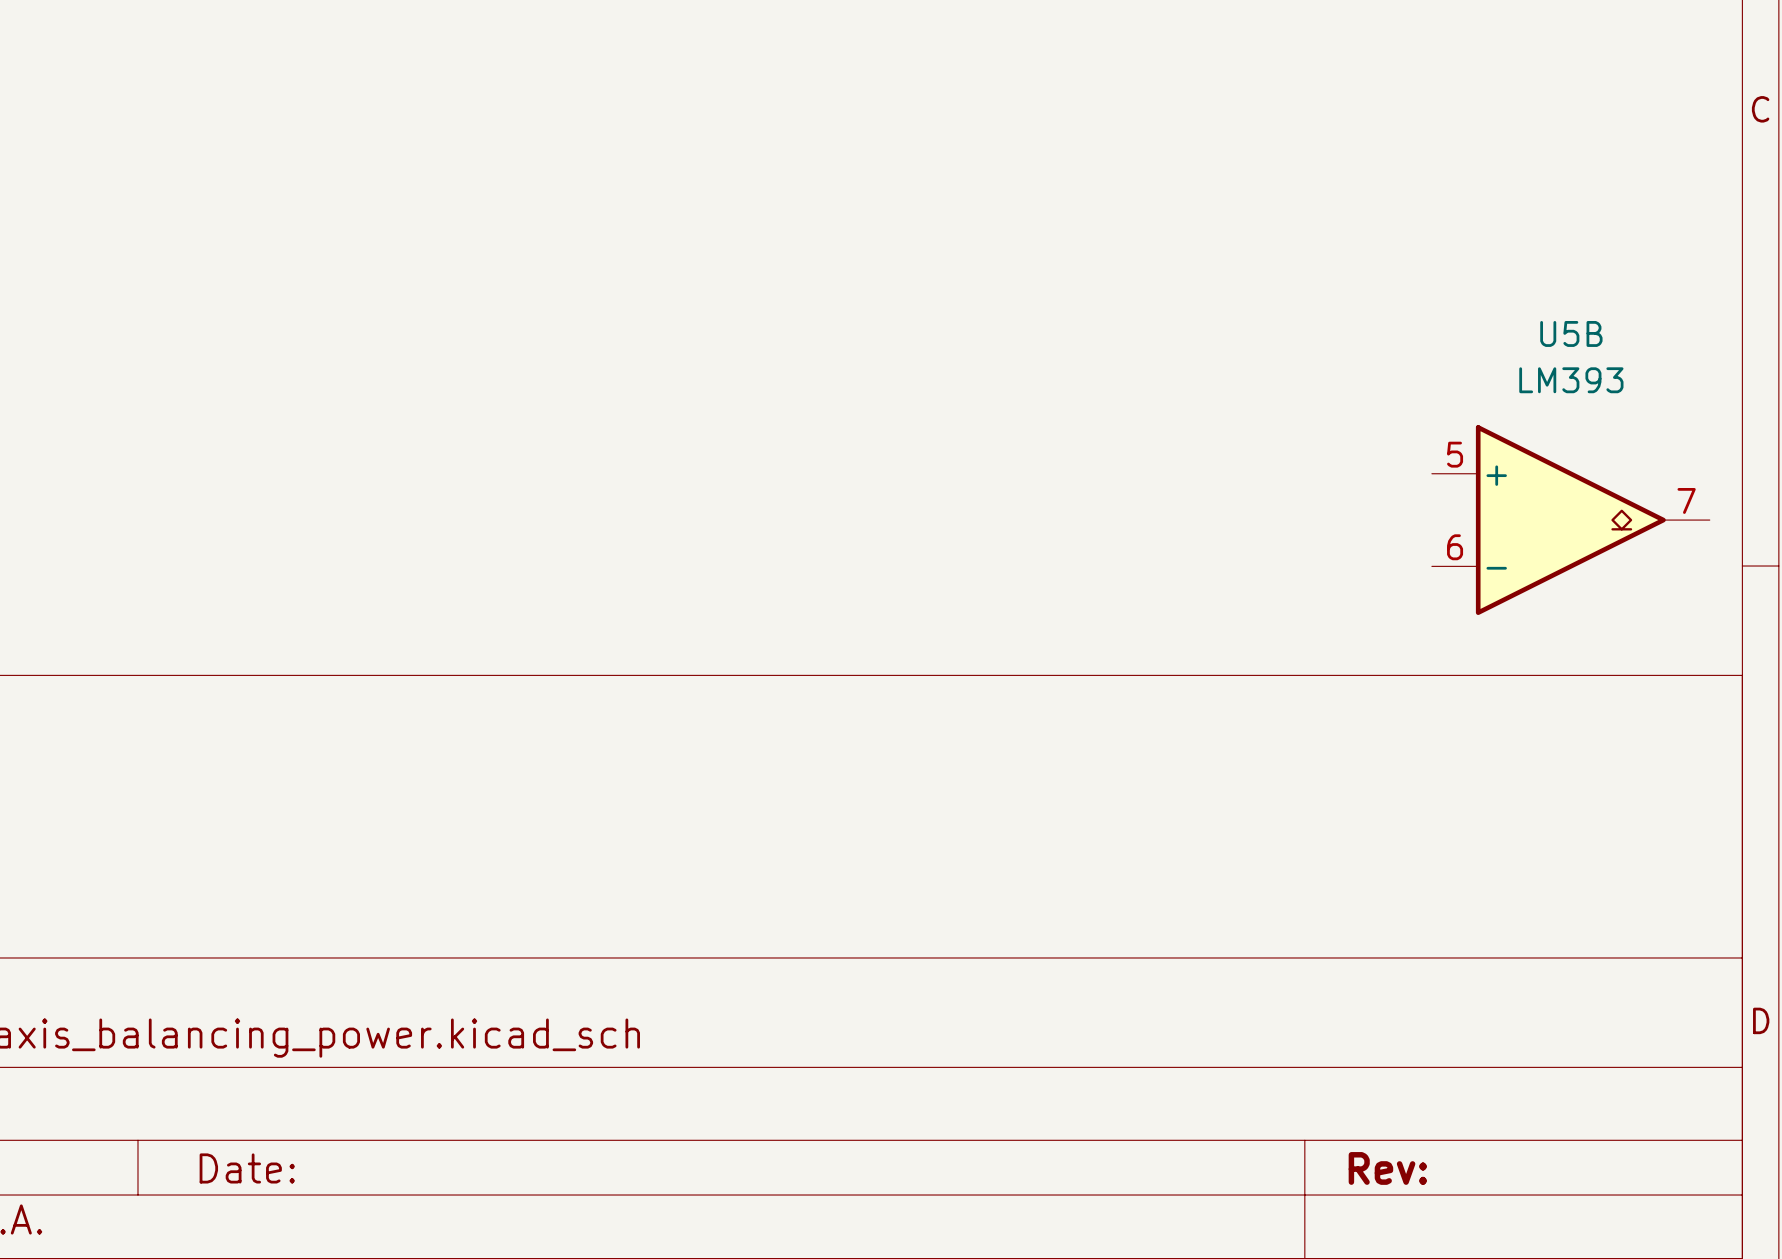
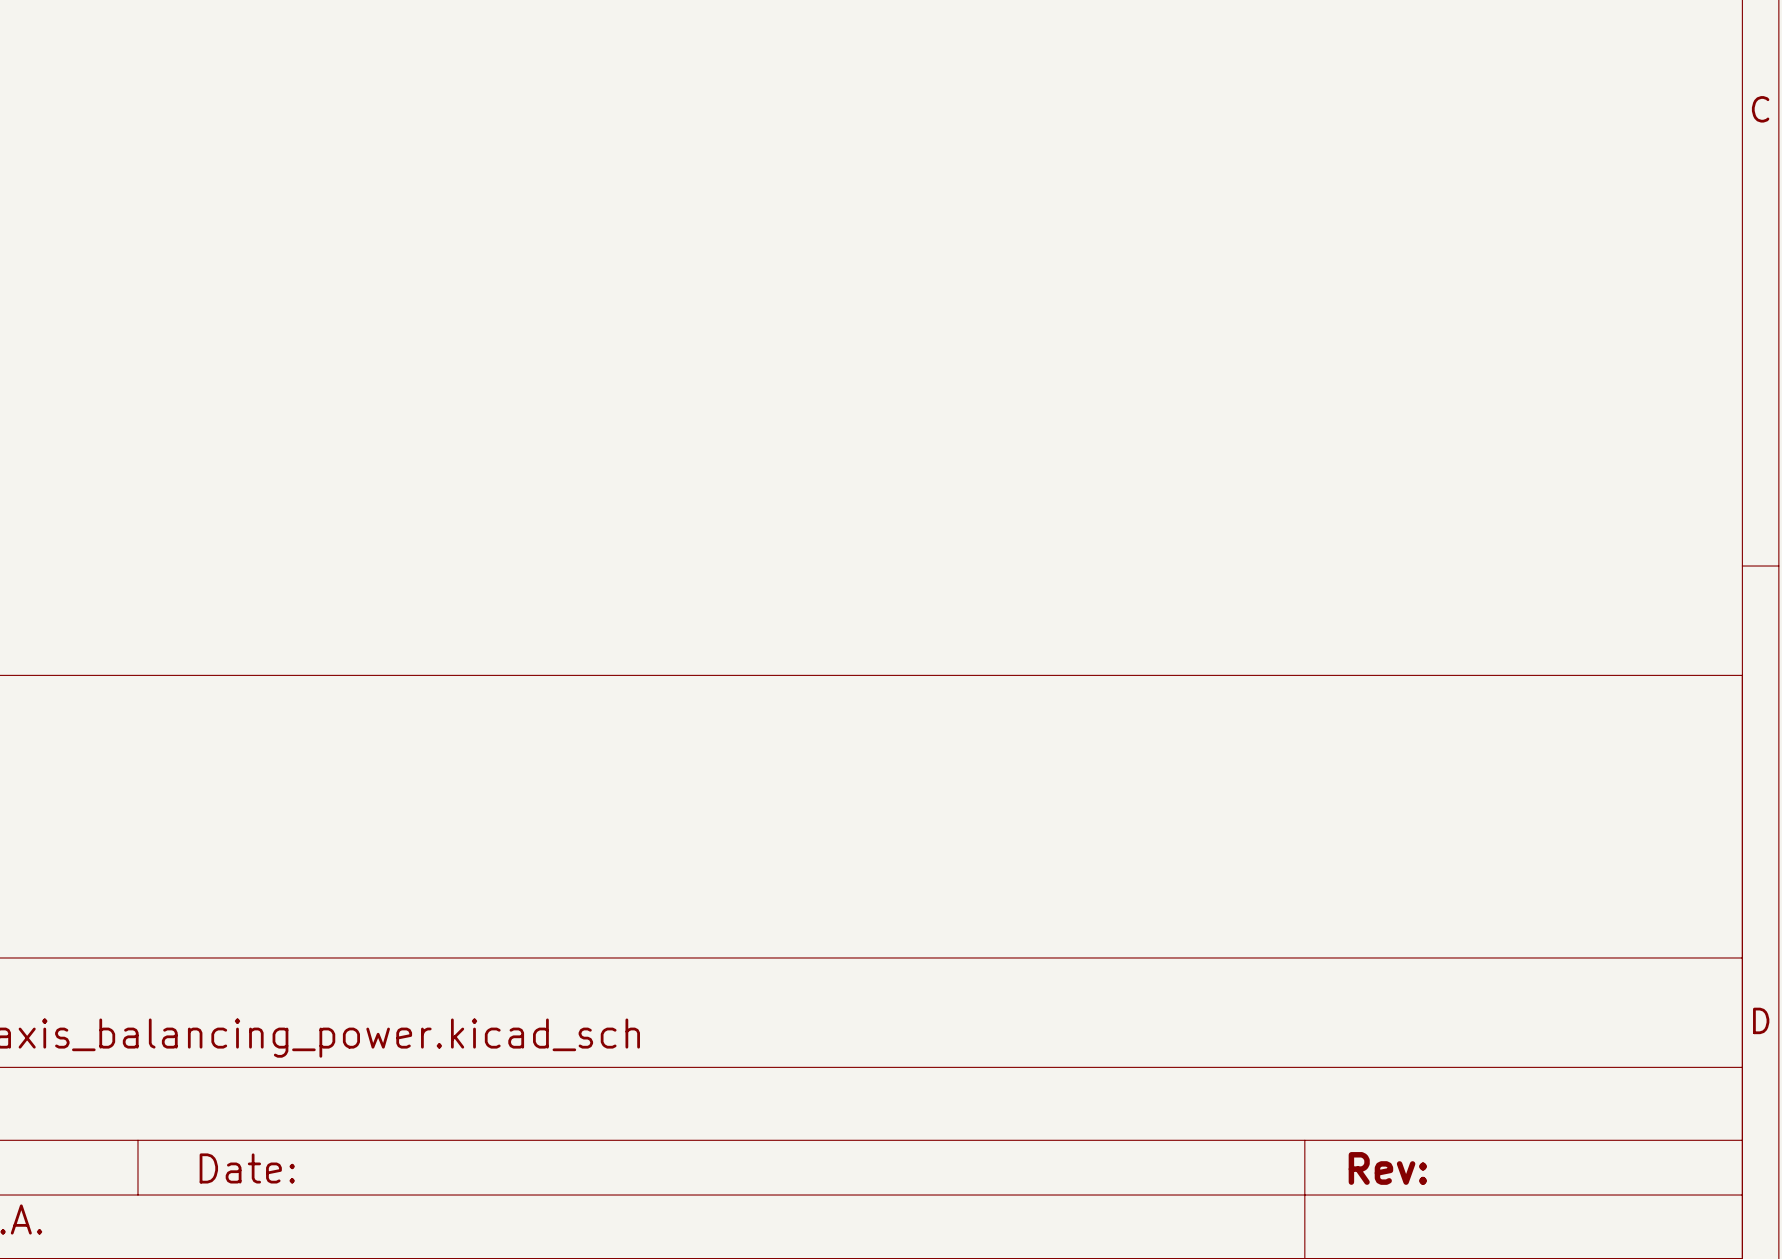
U5B: LM393 (1570, 520) -> none

